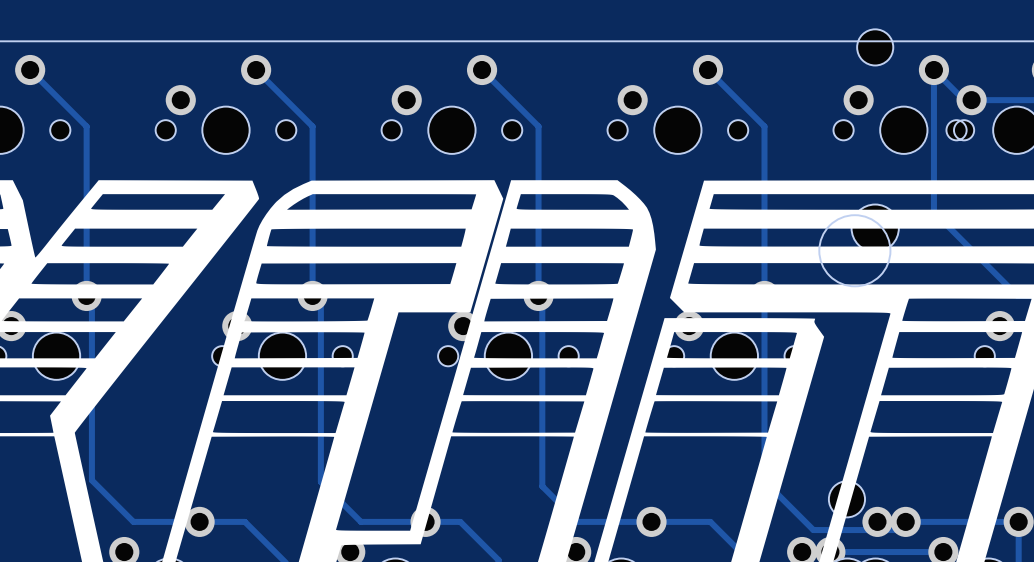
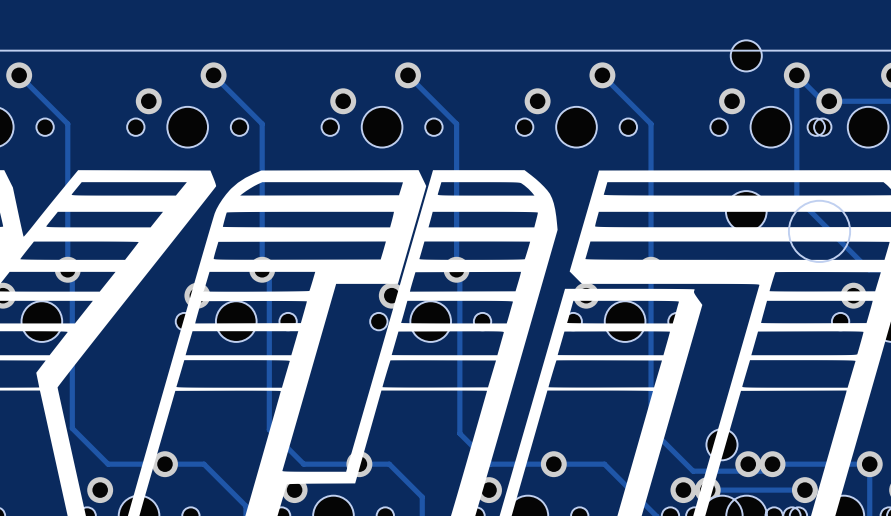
round board edge position: (854, 250) -> (819, 231)

